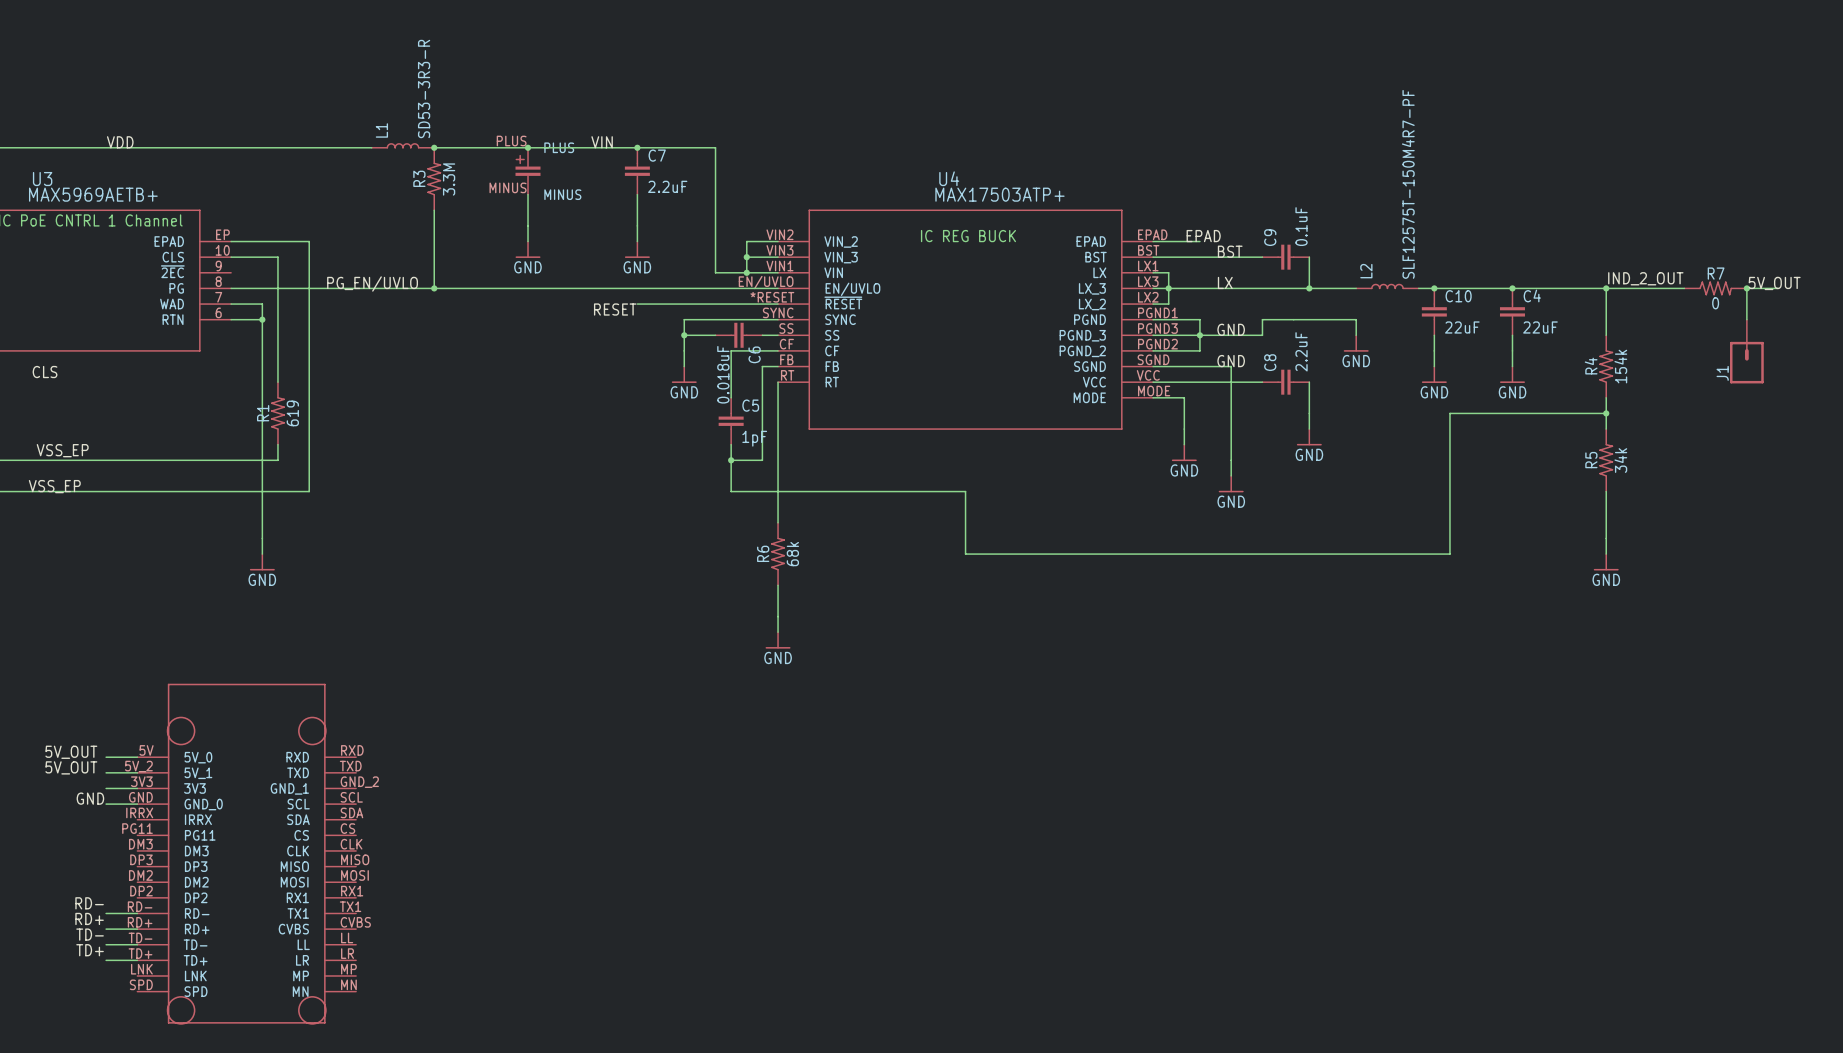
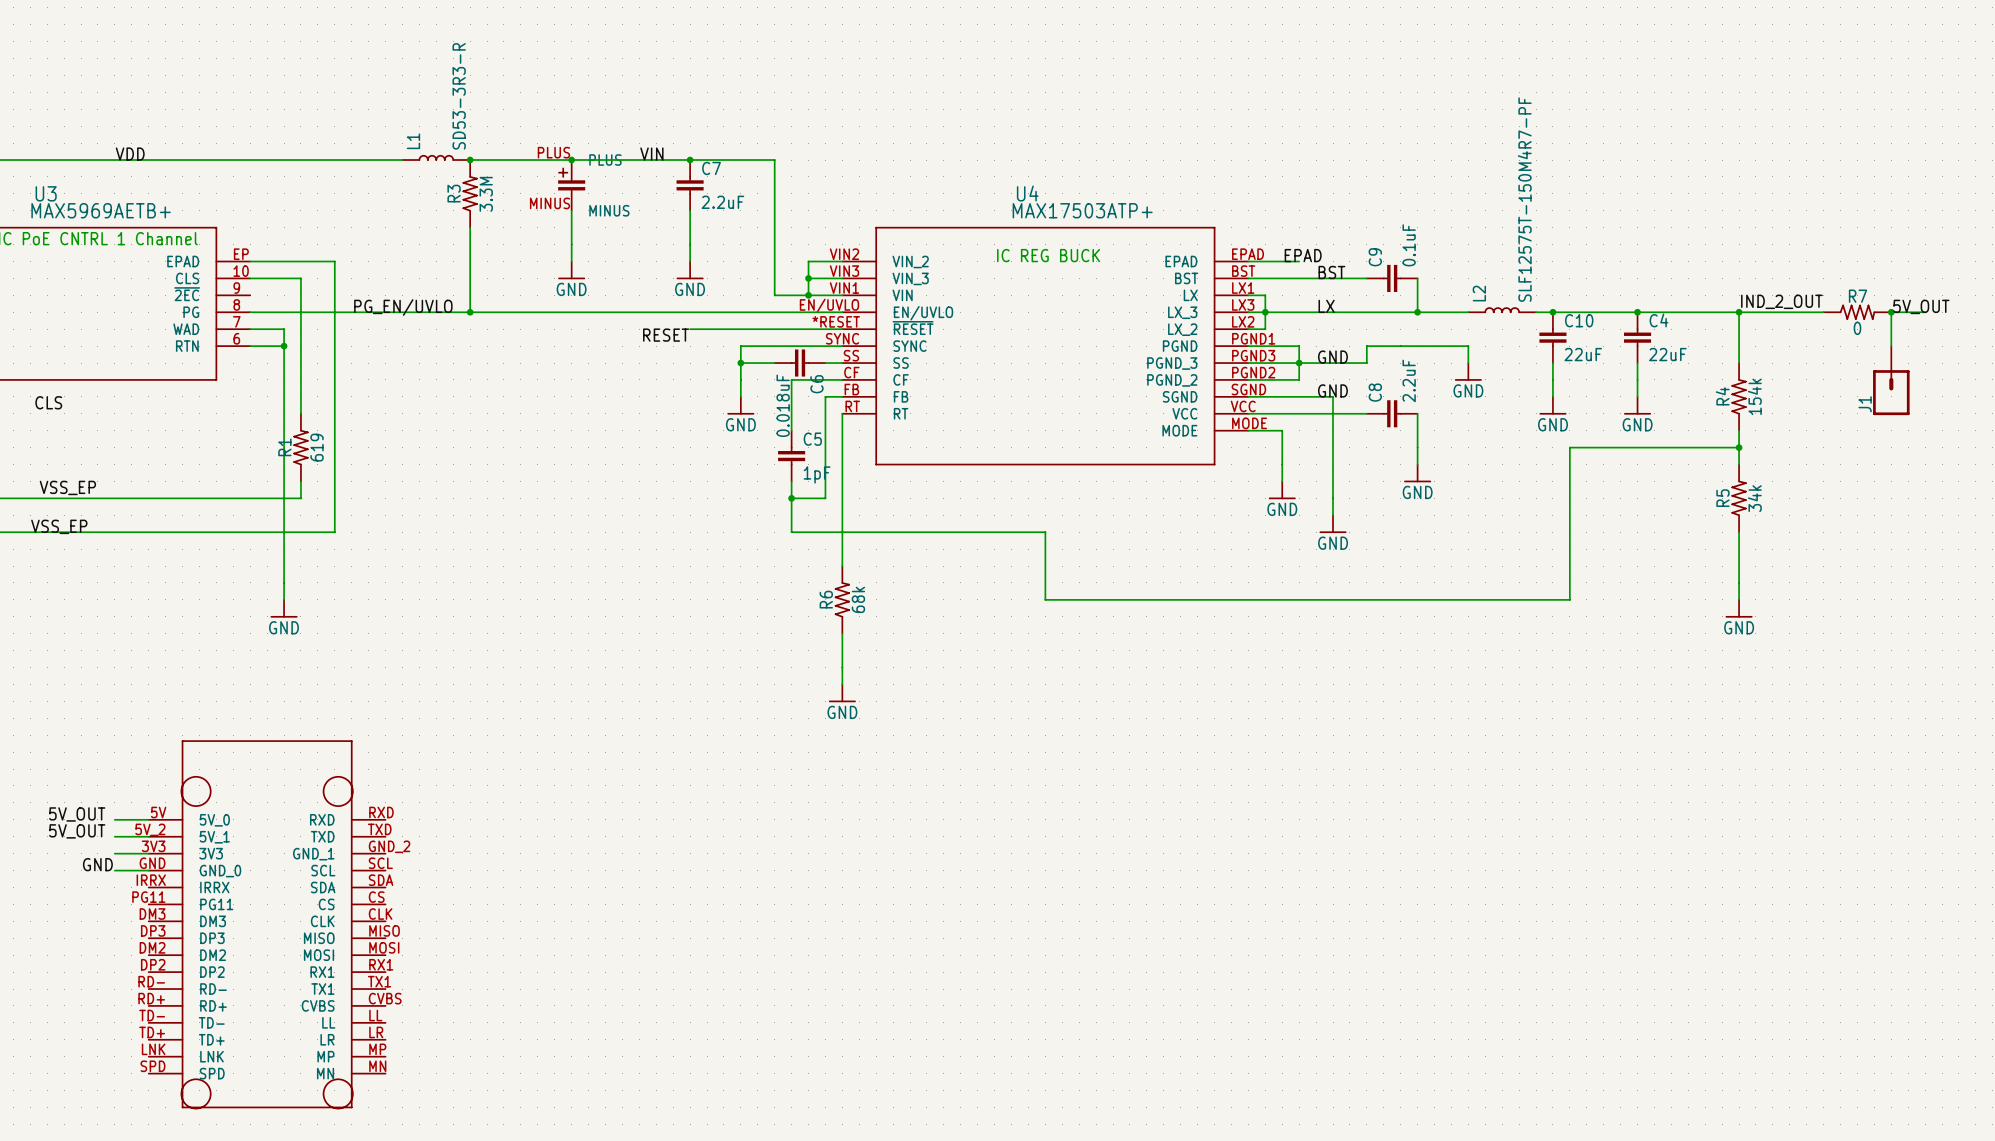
label: RD- (89, 903) -> none
wire: (106, 913) (137, 913) -> none
label: RD+ (89, 918) -> none
wire: (106, 929) (137, 929) -> none
label: TD- (90, 934) -> none
wire: (106, 944) (137, 944) -> none
label: TD+ (90, 950) -> none
wire: (106, 960) (137, 960) -> none

